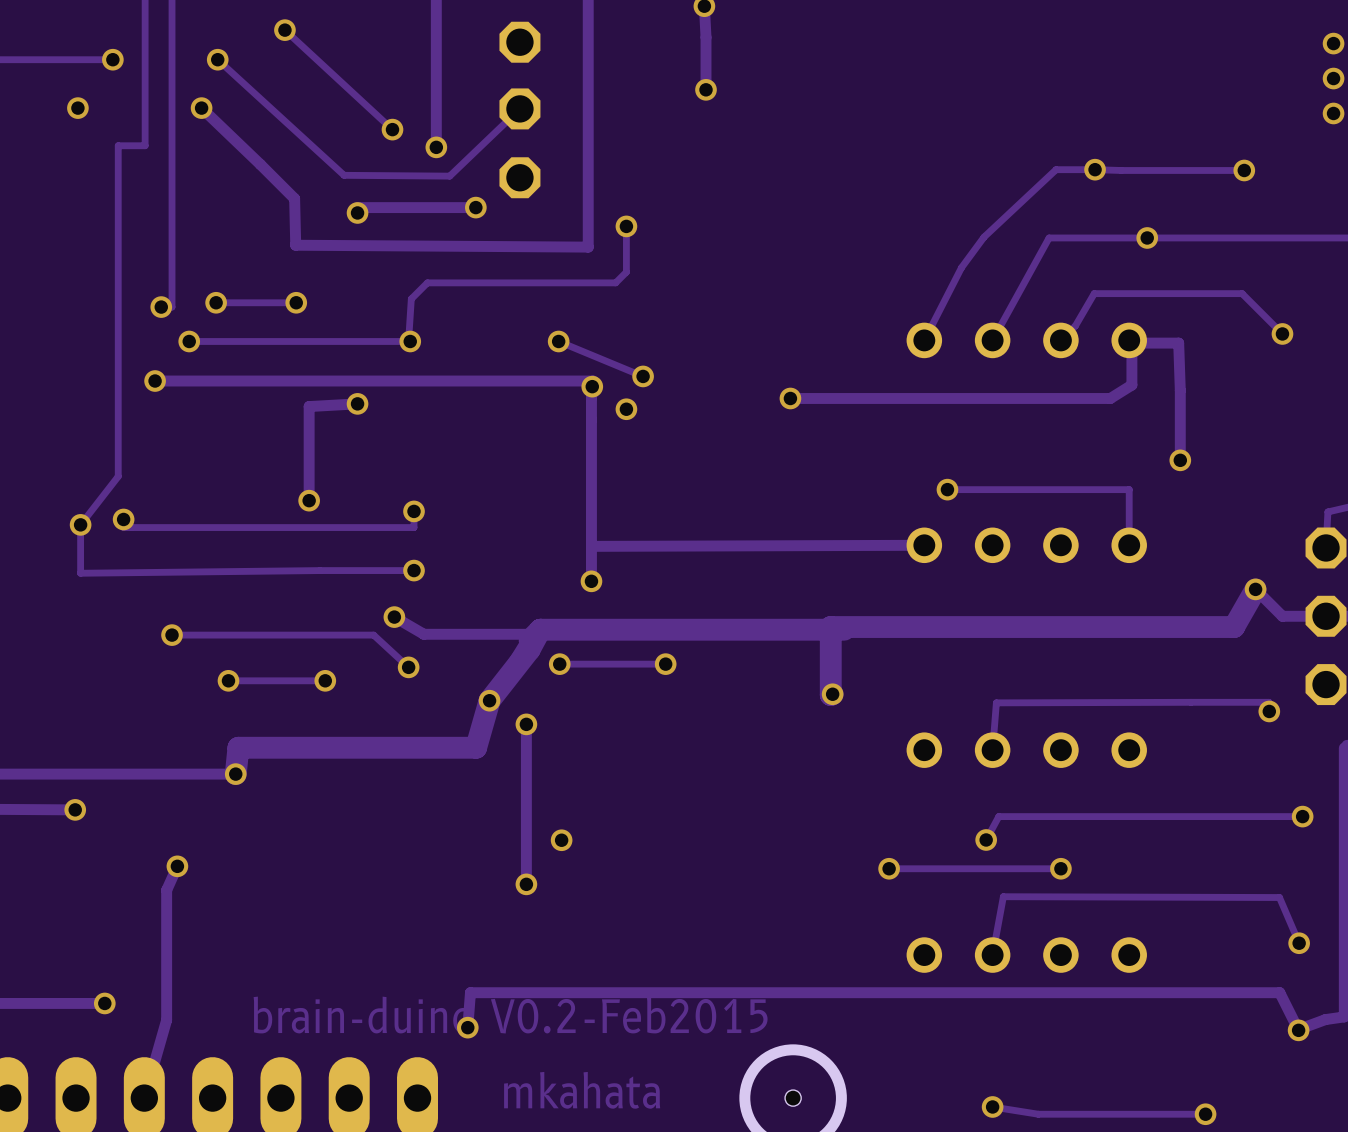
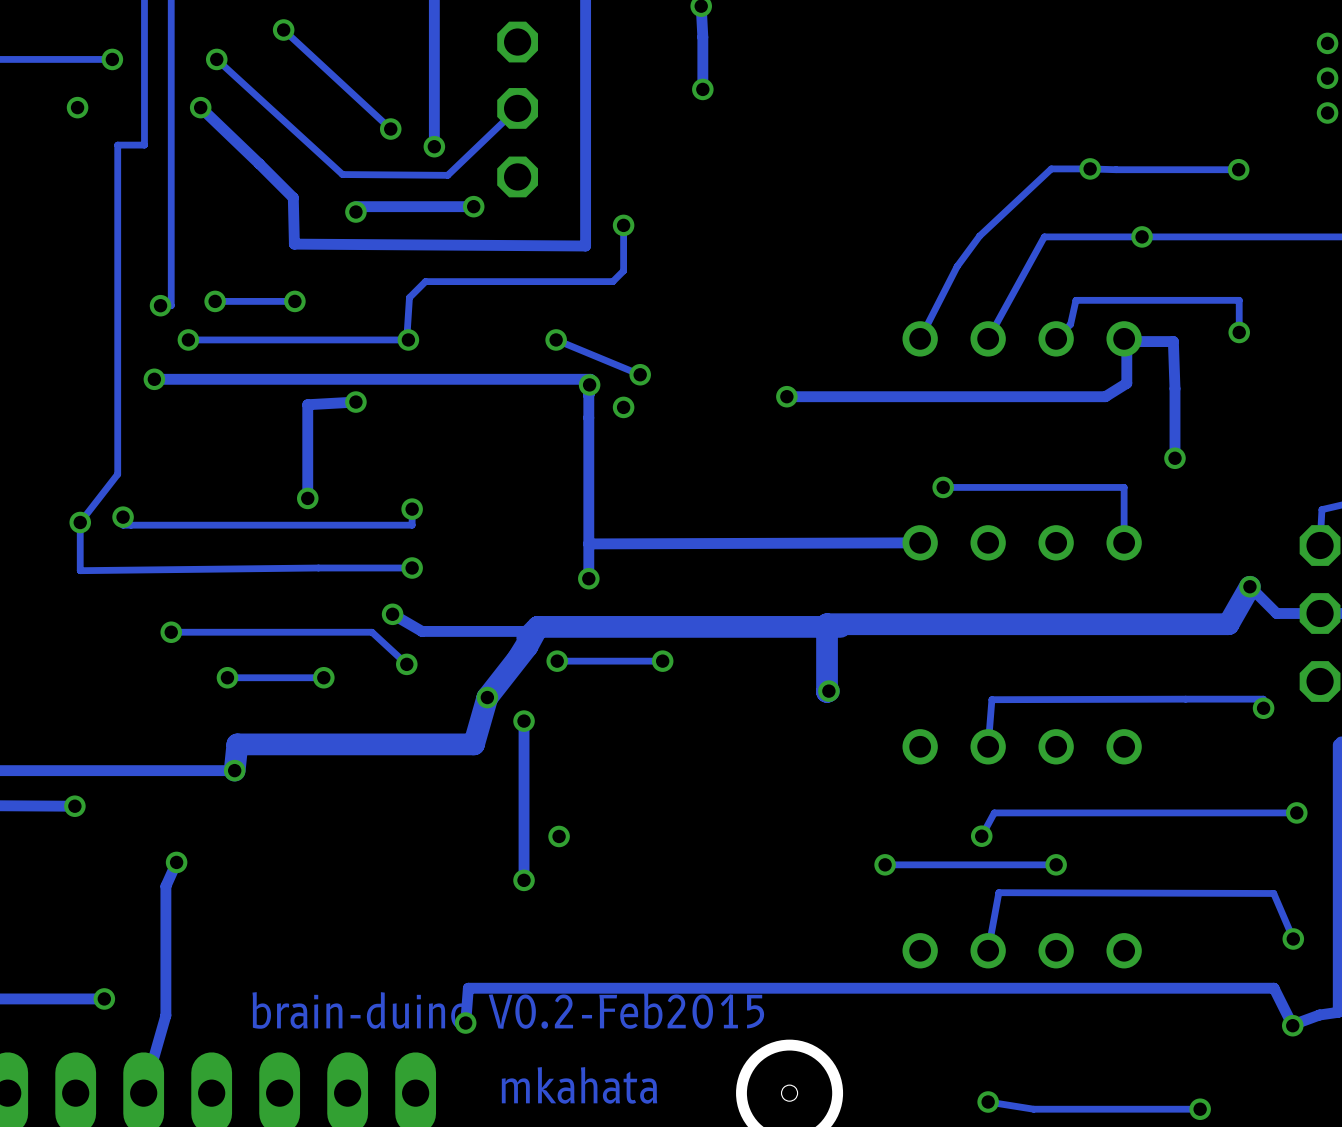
track: (1075, 325) (1094, 293) (1242, 293) (1282, 333) -> (1070, 324) (1075, 300) (1239, 300) (1239, 332)
via position: (1282, 333) -> (1239, 332)

